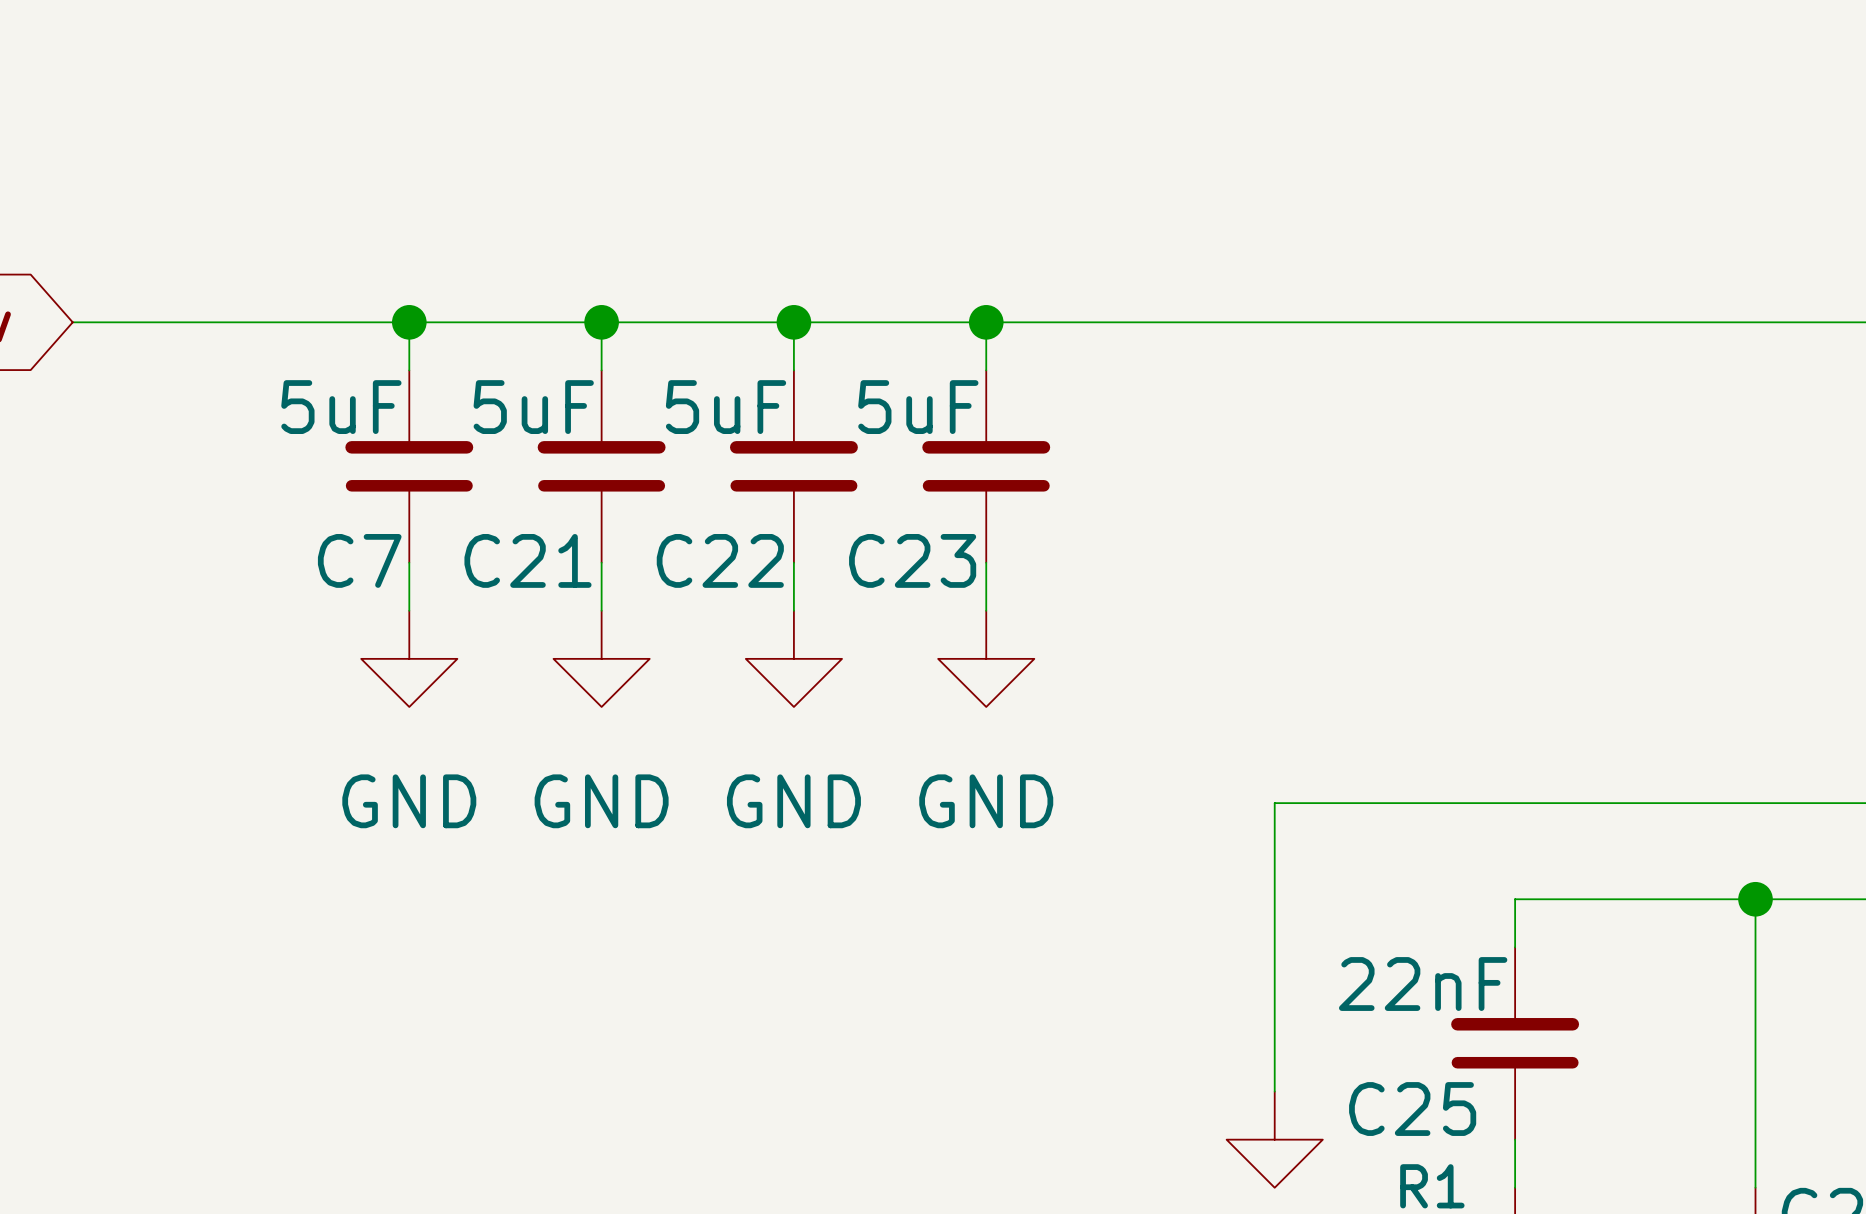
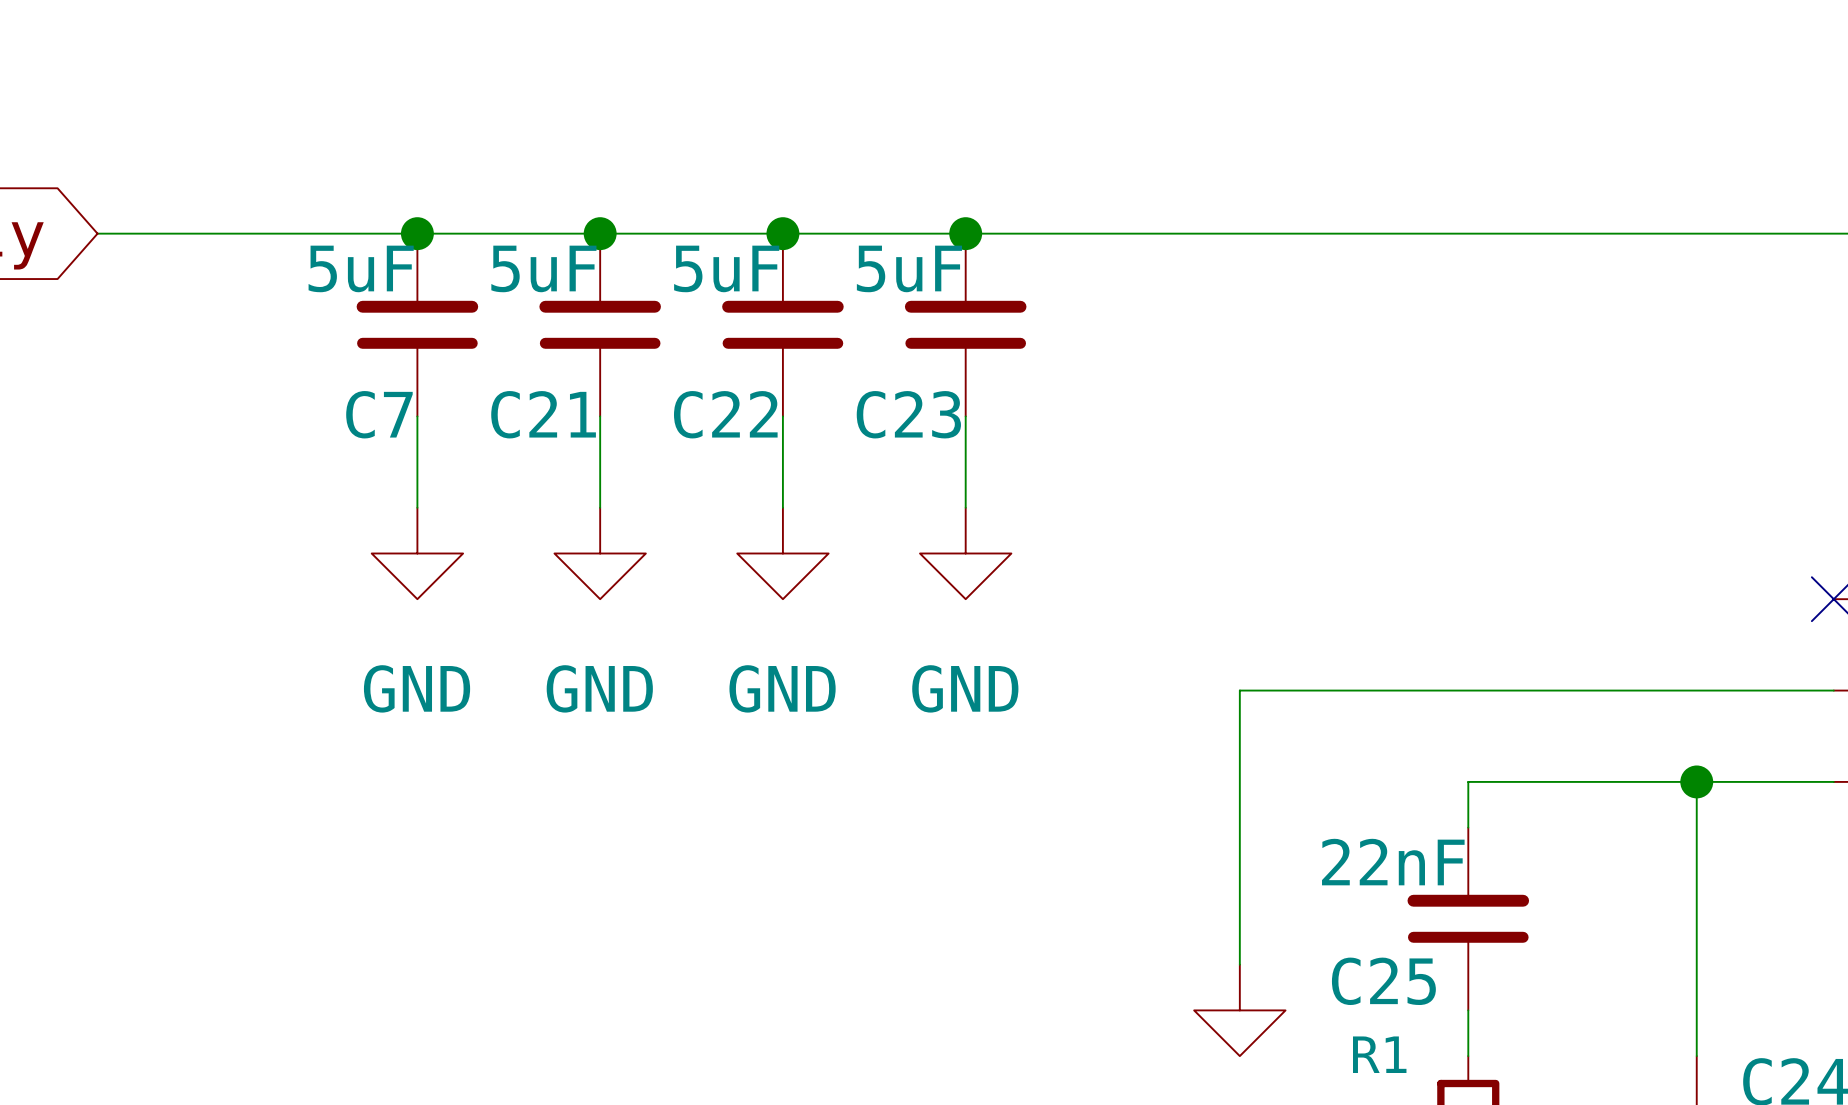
C7 position: (409, 466) -> (417, 325)
C21 position: (601, 466) -> (600, 325)
C22 position: (793, 466) -> (782, 325)
C23 position: (986, 466) -> (965, 325)

